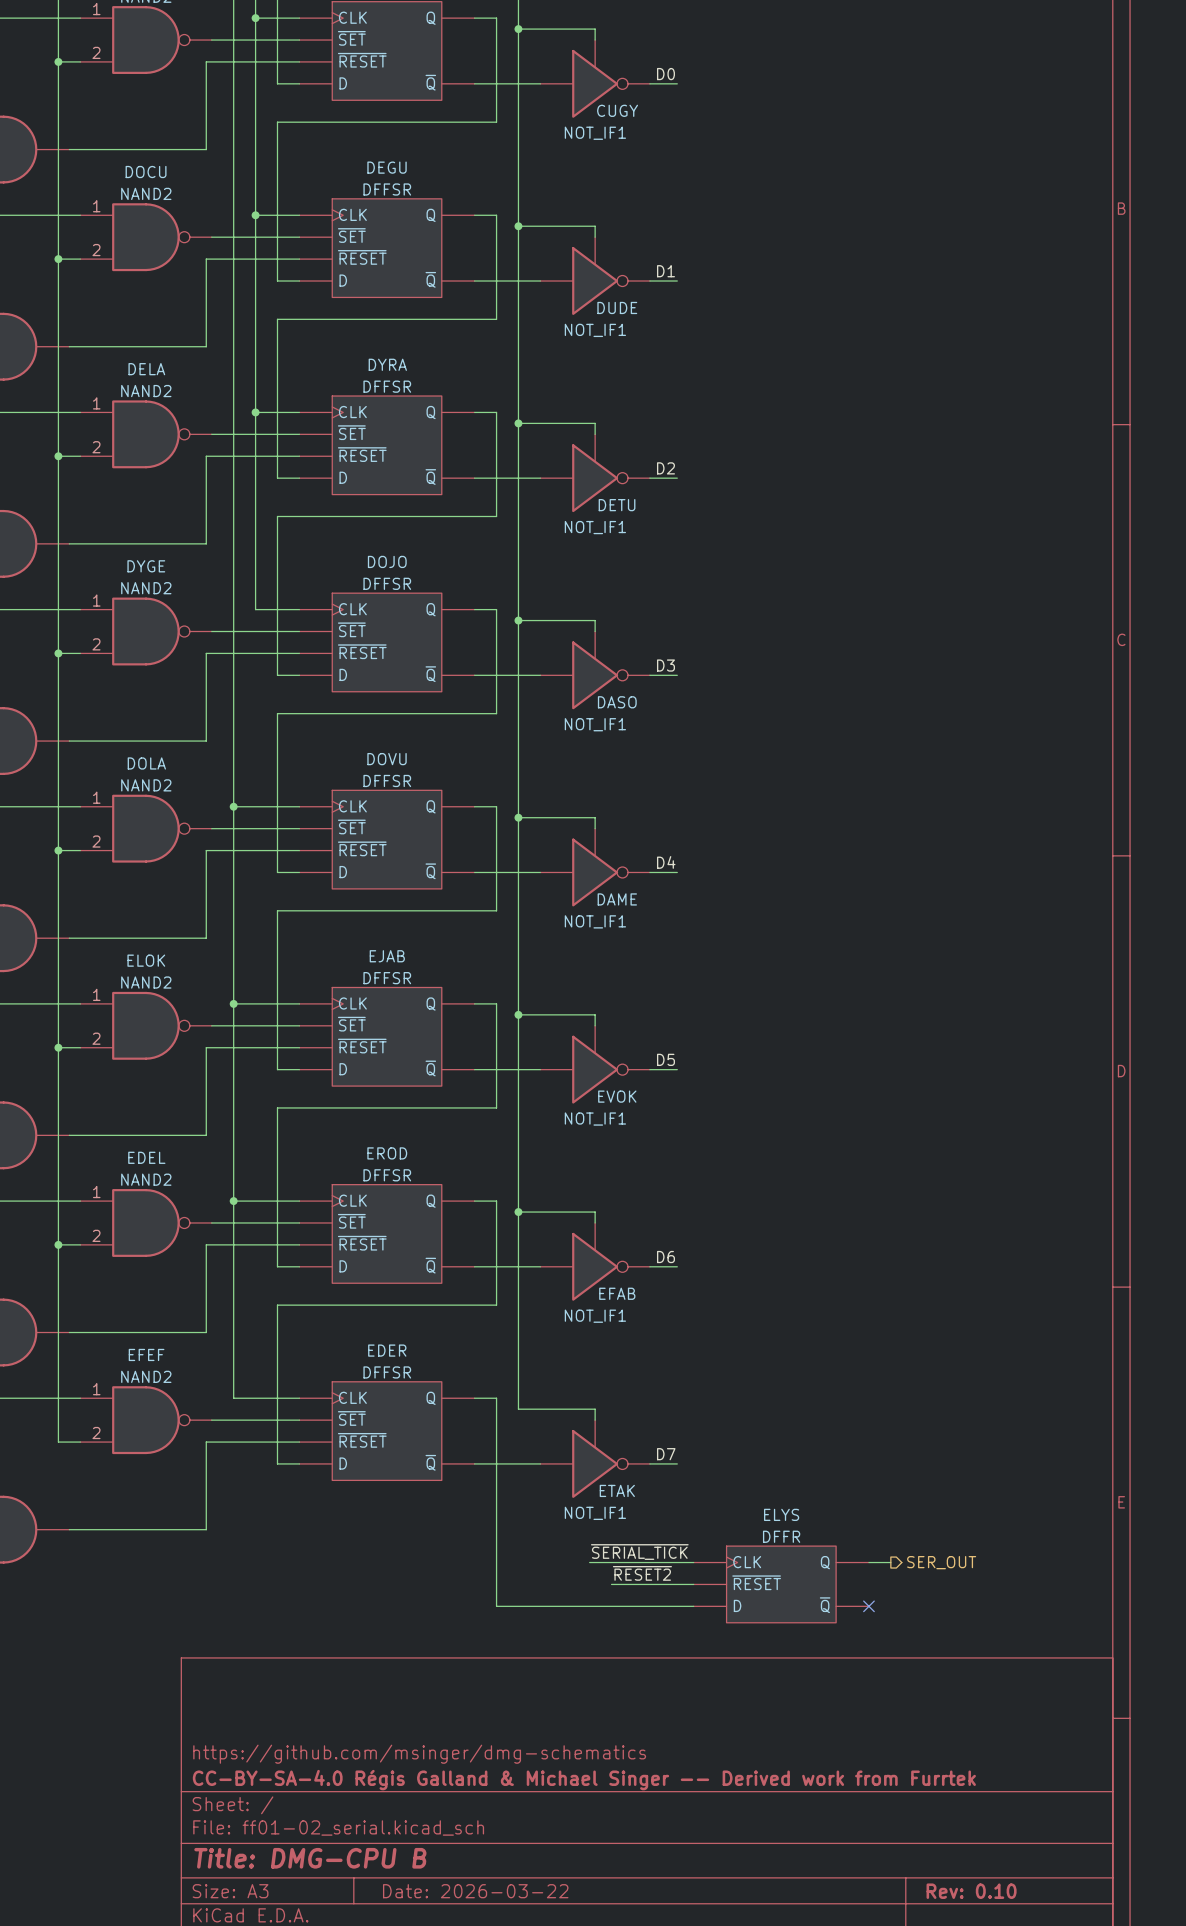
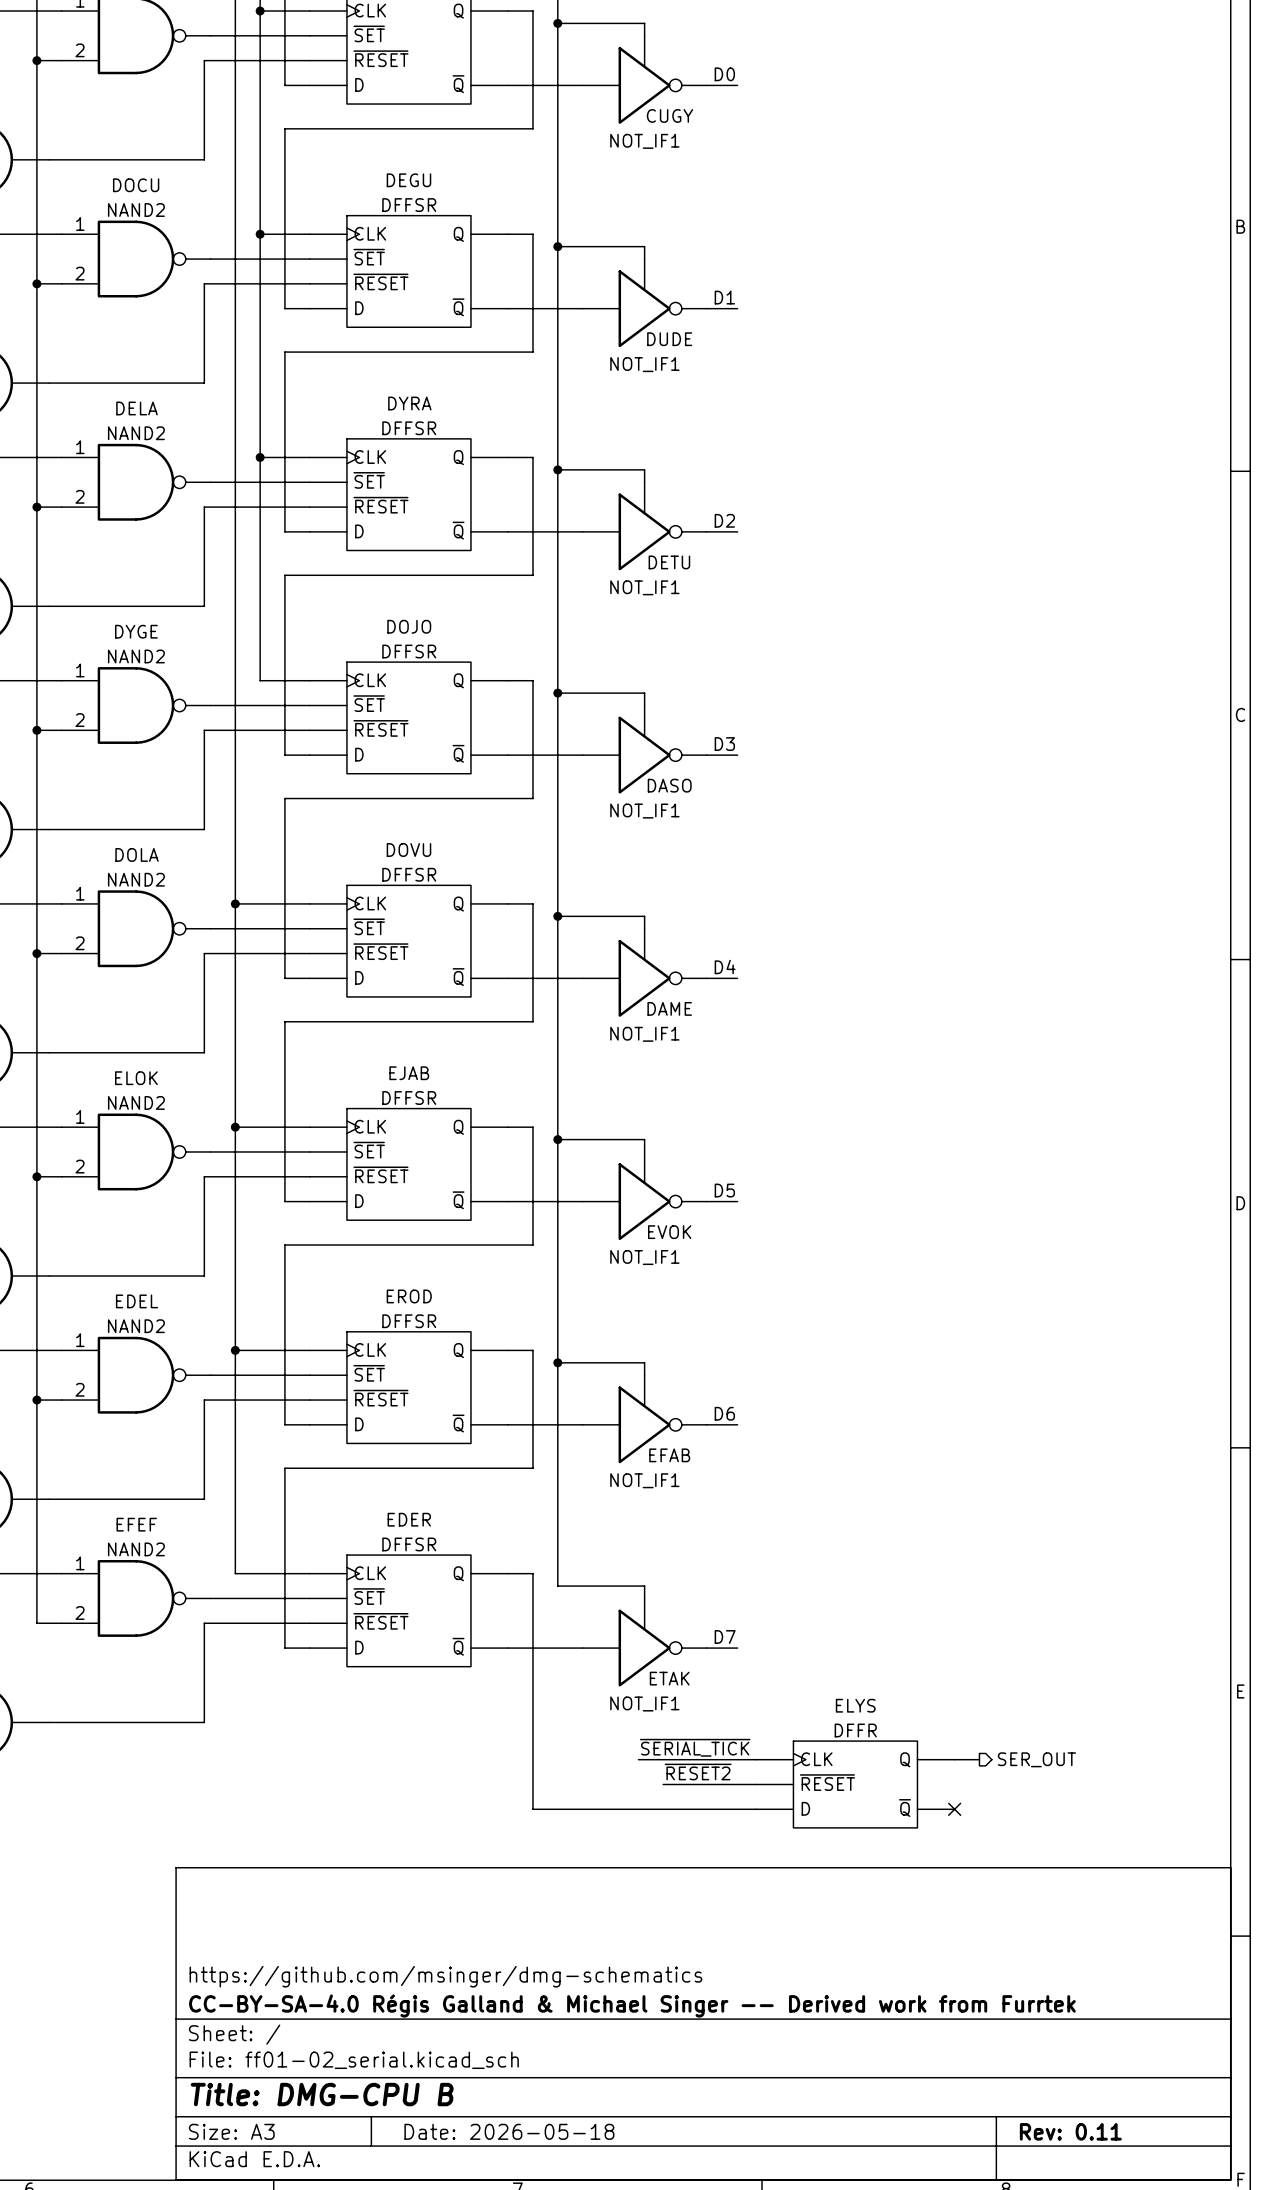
title block: Date: 2026-03-22 (475, 1891) -> Date: 2026-05-18 (509, 2131)
title block: Rev: 0.10 (971, 1891) -> Rev: 0.11 (1070, 2131)

